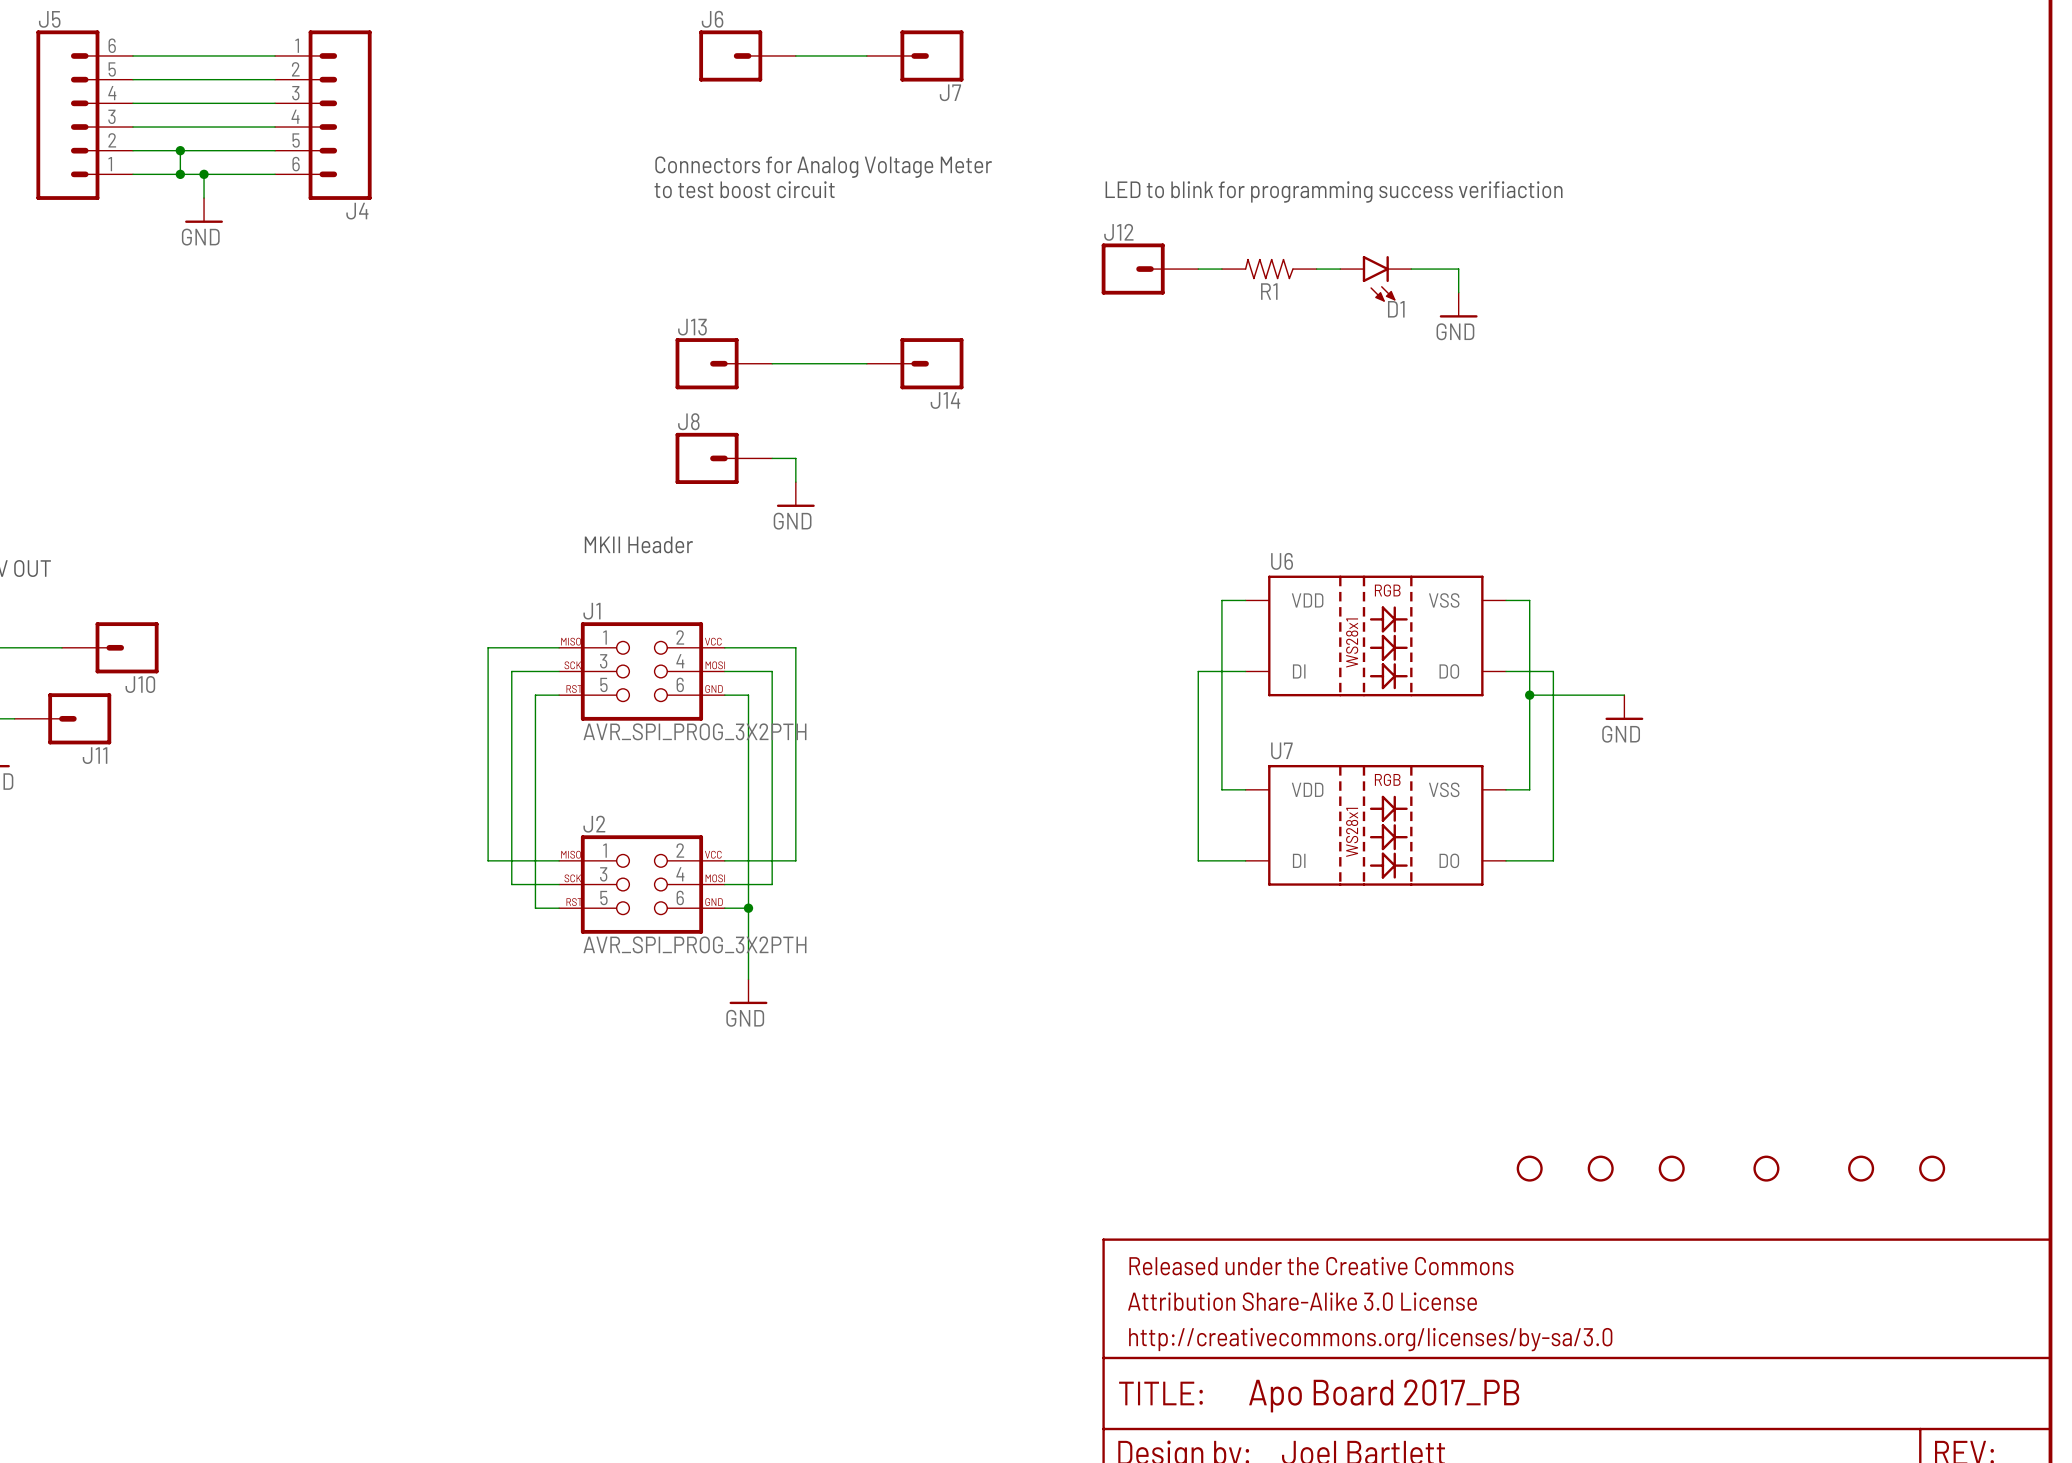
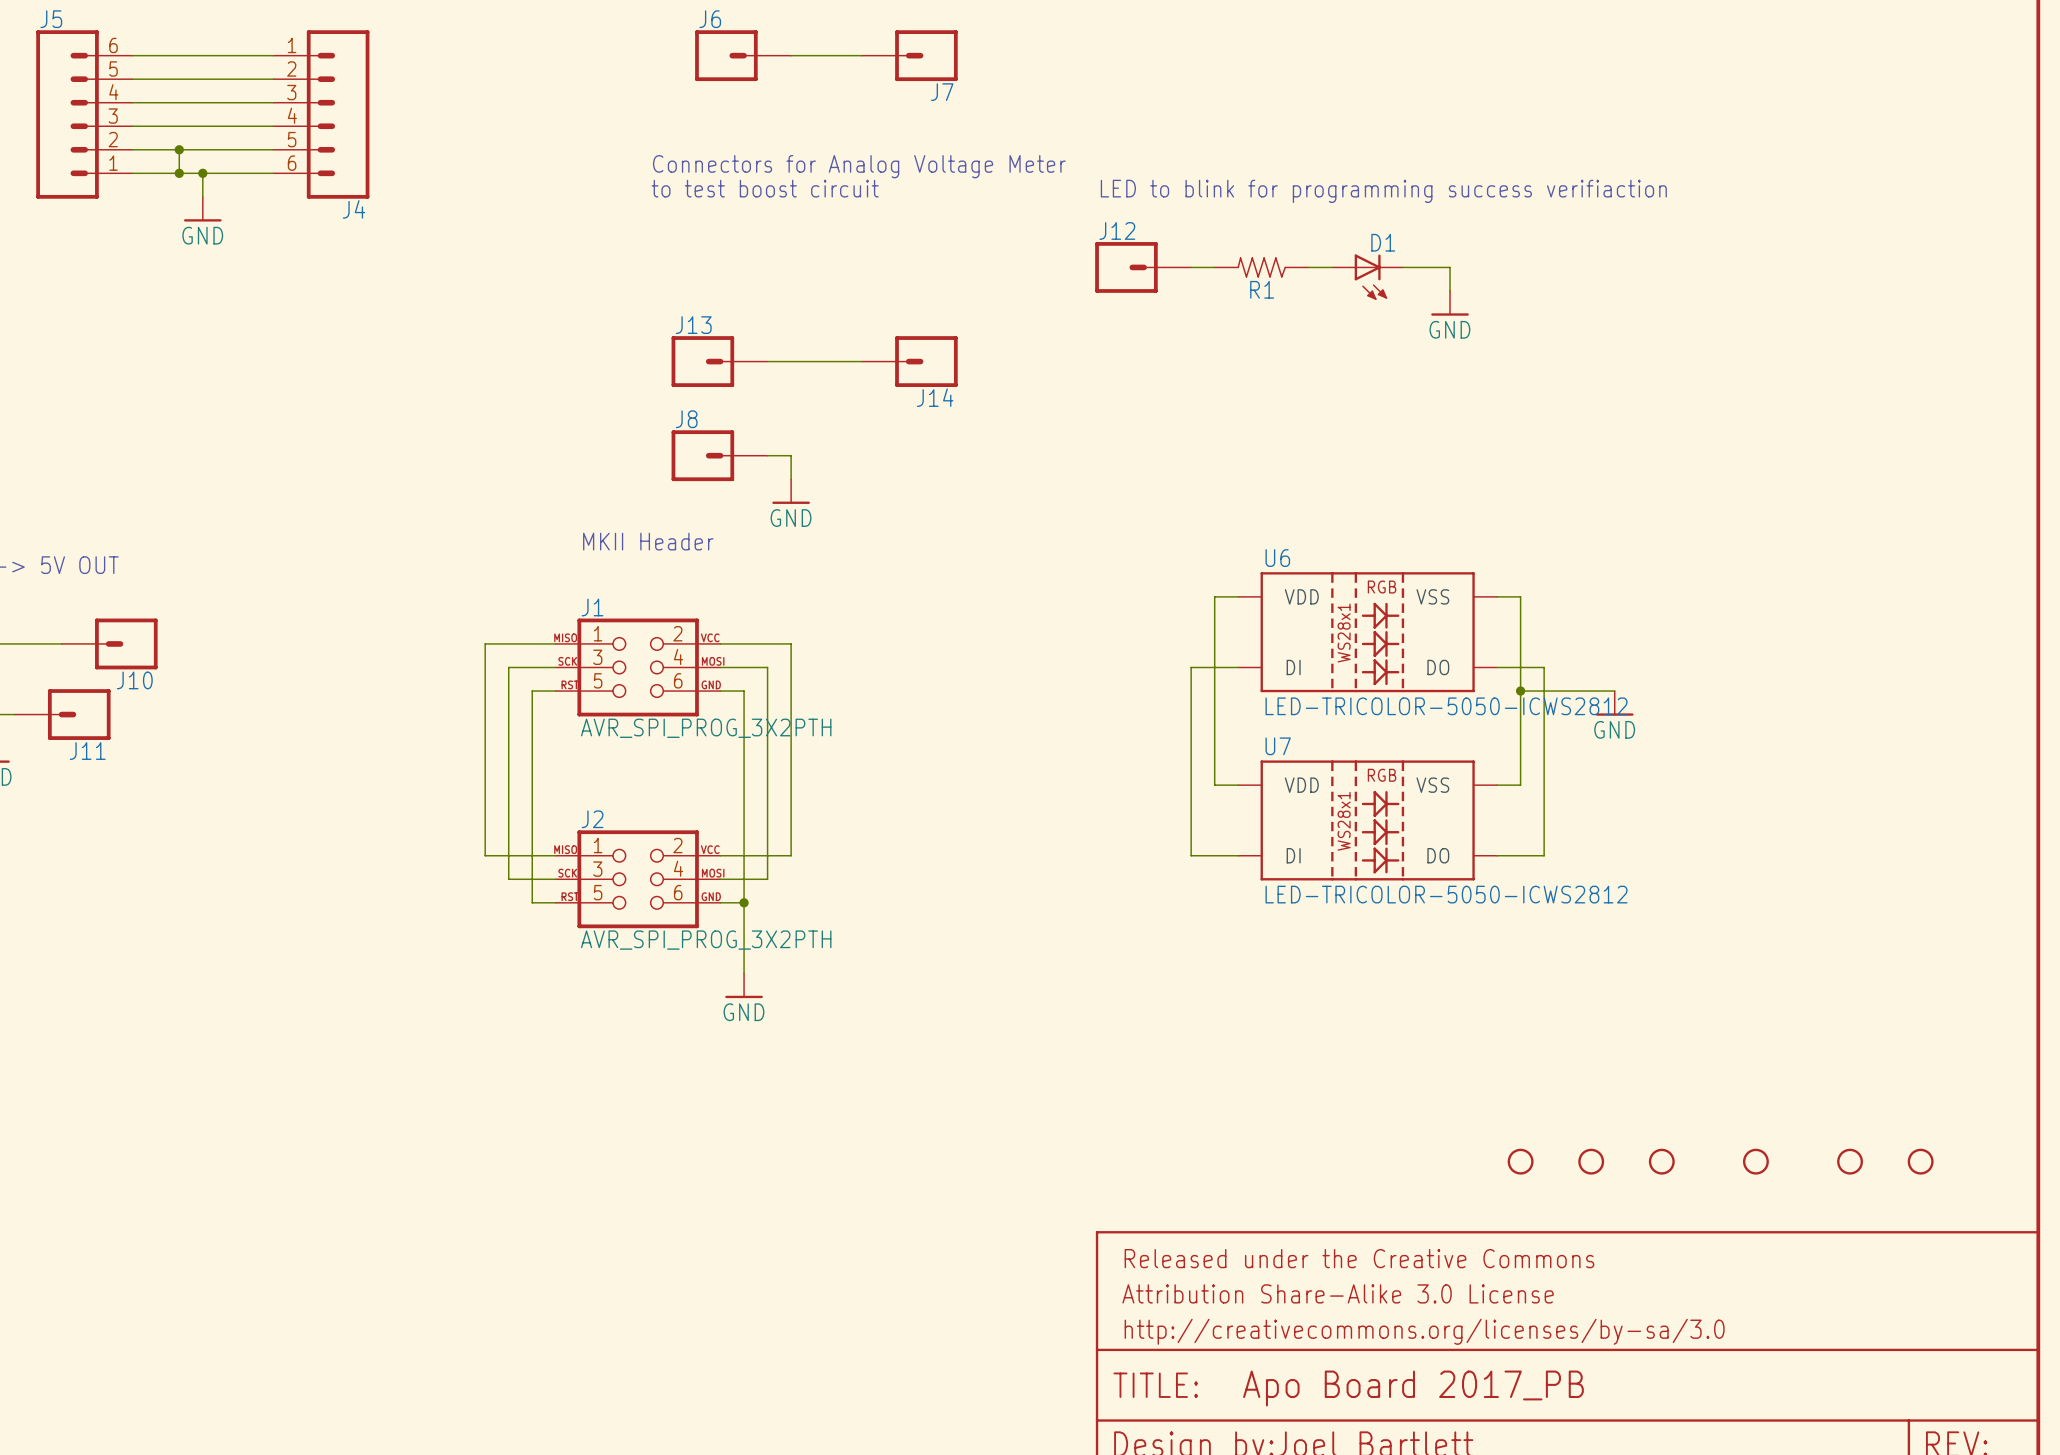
D1 symbol: [1340, 256, 1412, 302] -> [1332, 254, 1403, 300]
D1 name position: D1 (1396, 309) -> D1 (1383, 242)
U6 value: none -> LED-TRICOLOR-5050-ICWS2812 (1446, 706)
U7 value: none -> LED-TRICOLOR-5050-ICWS2812 (1446, 894)

